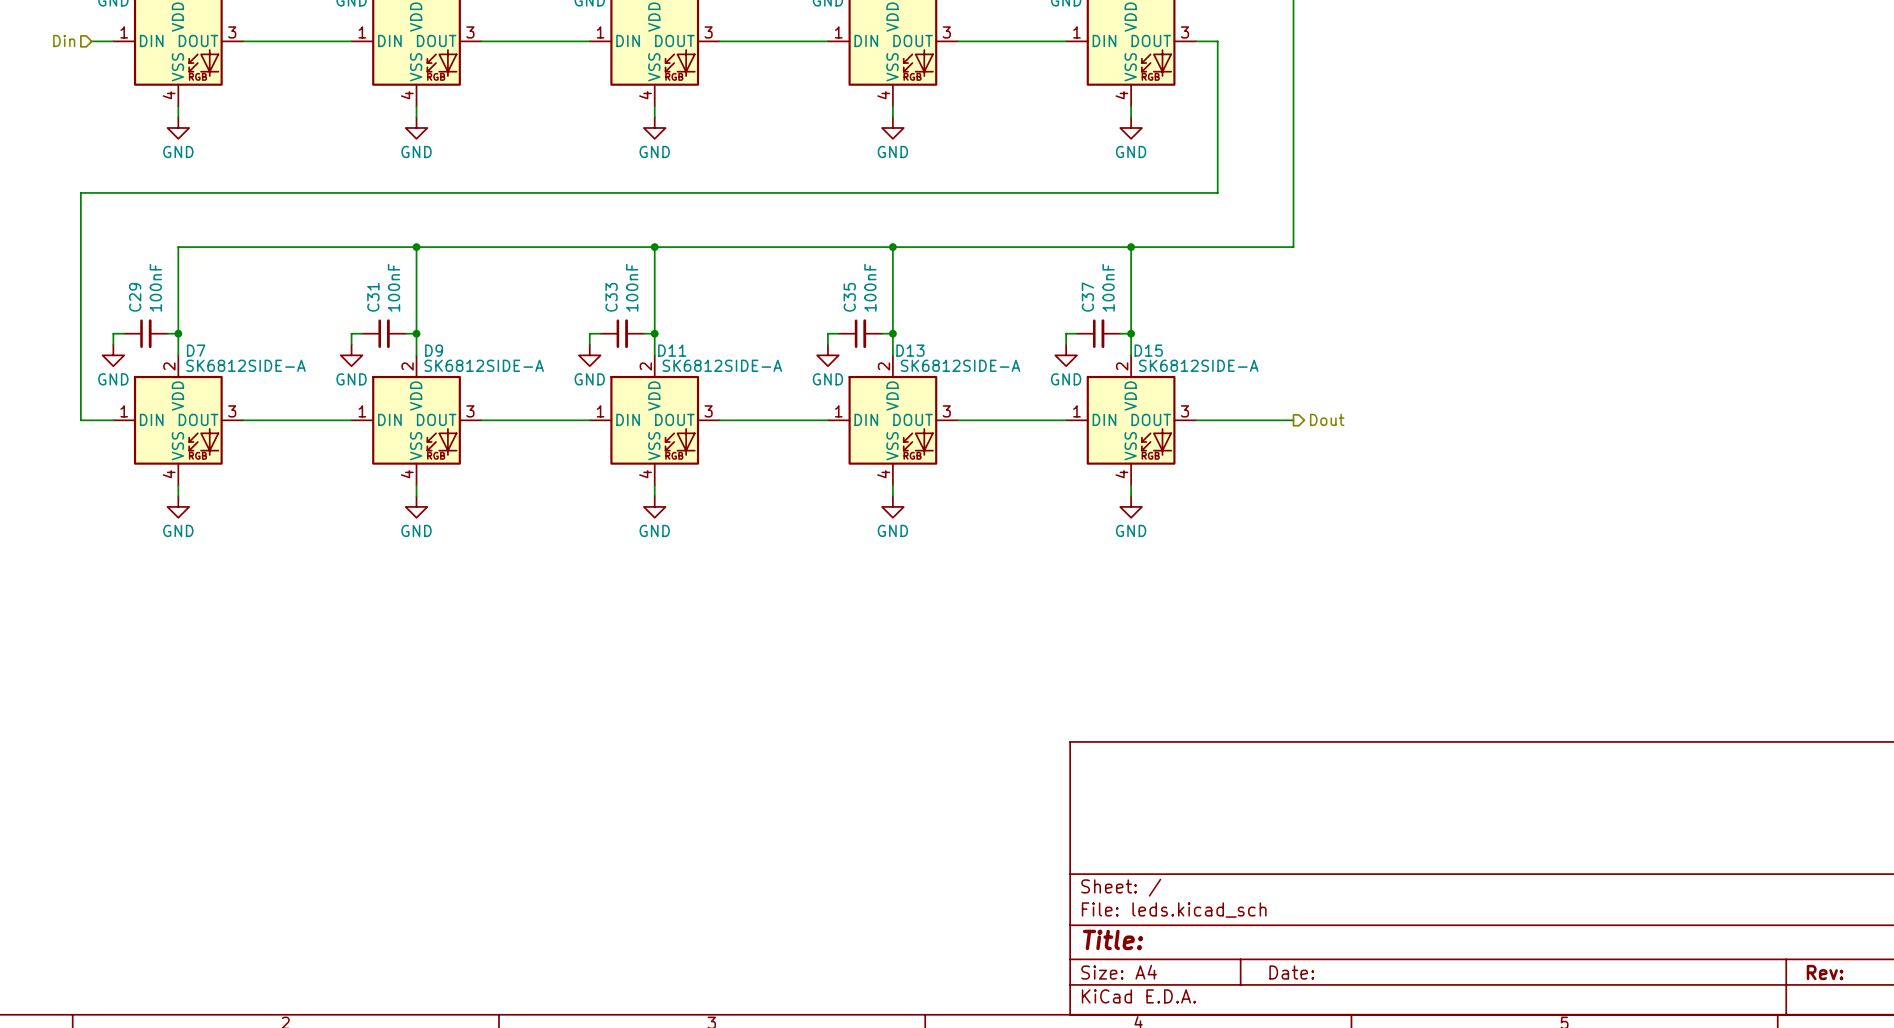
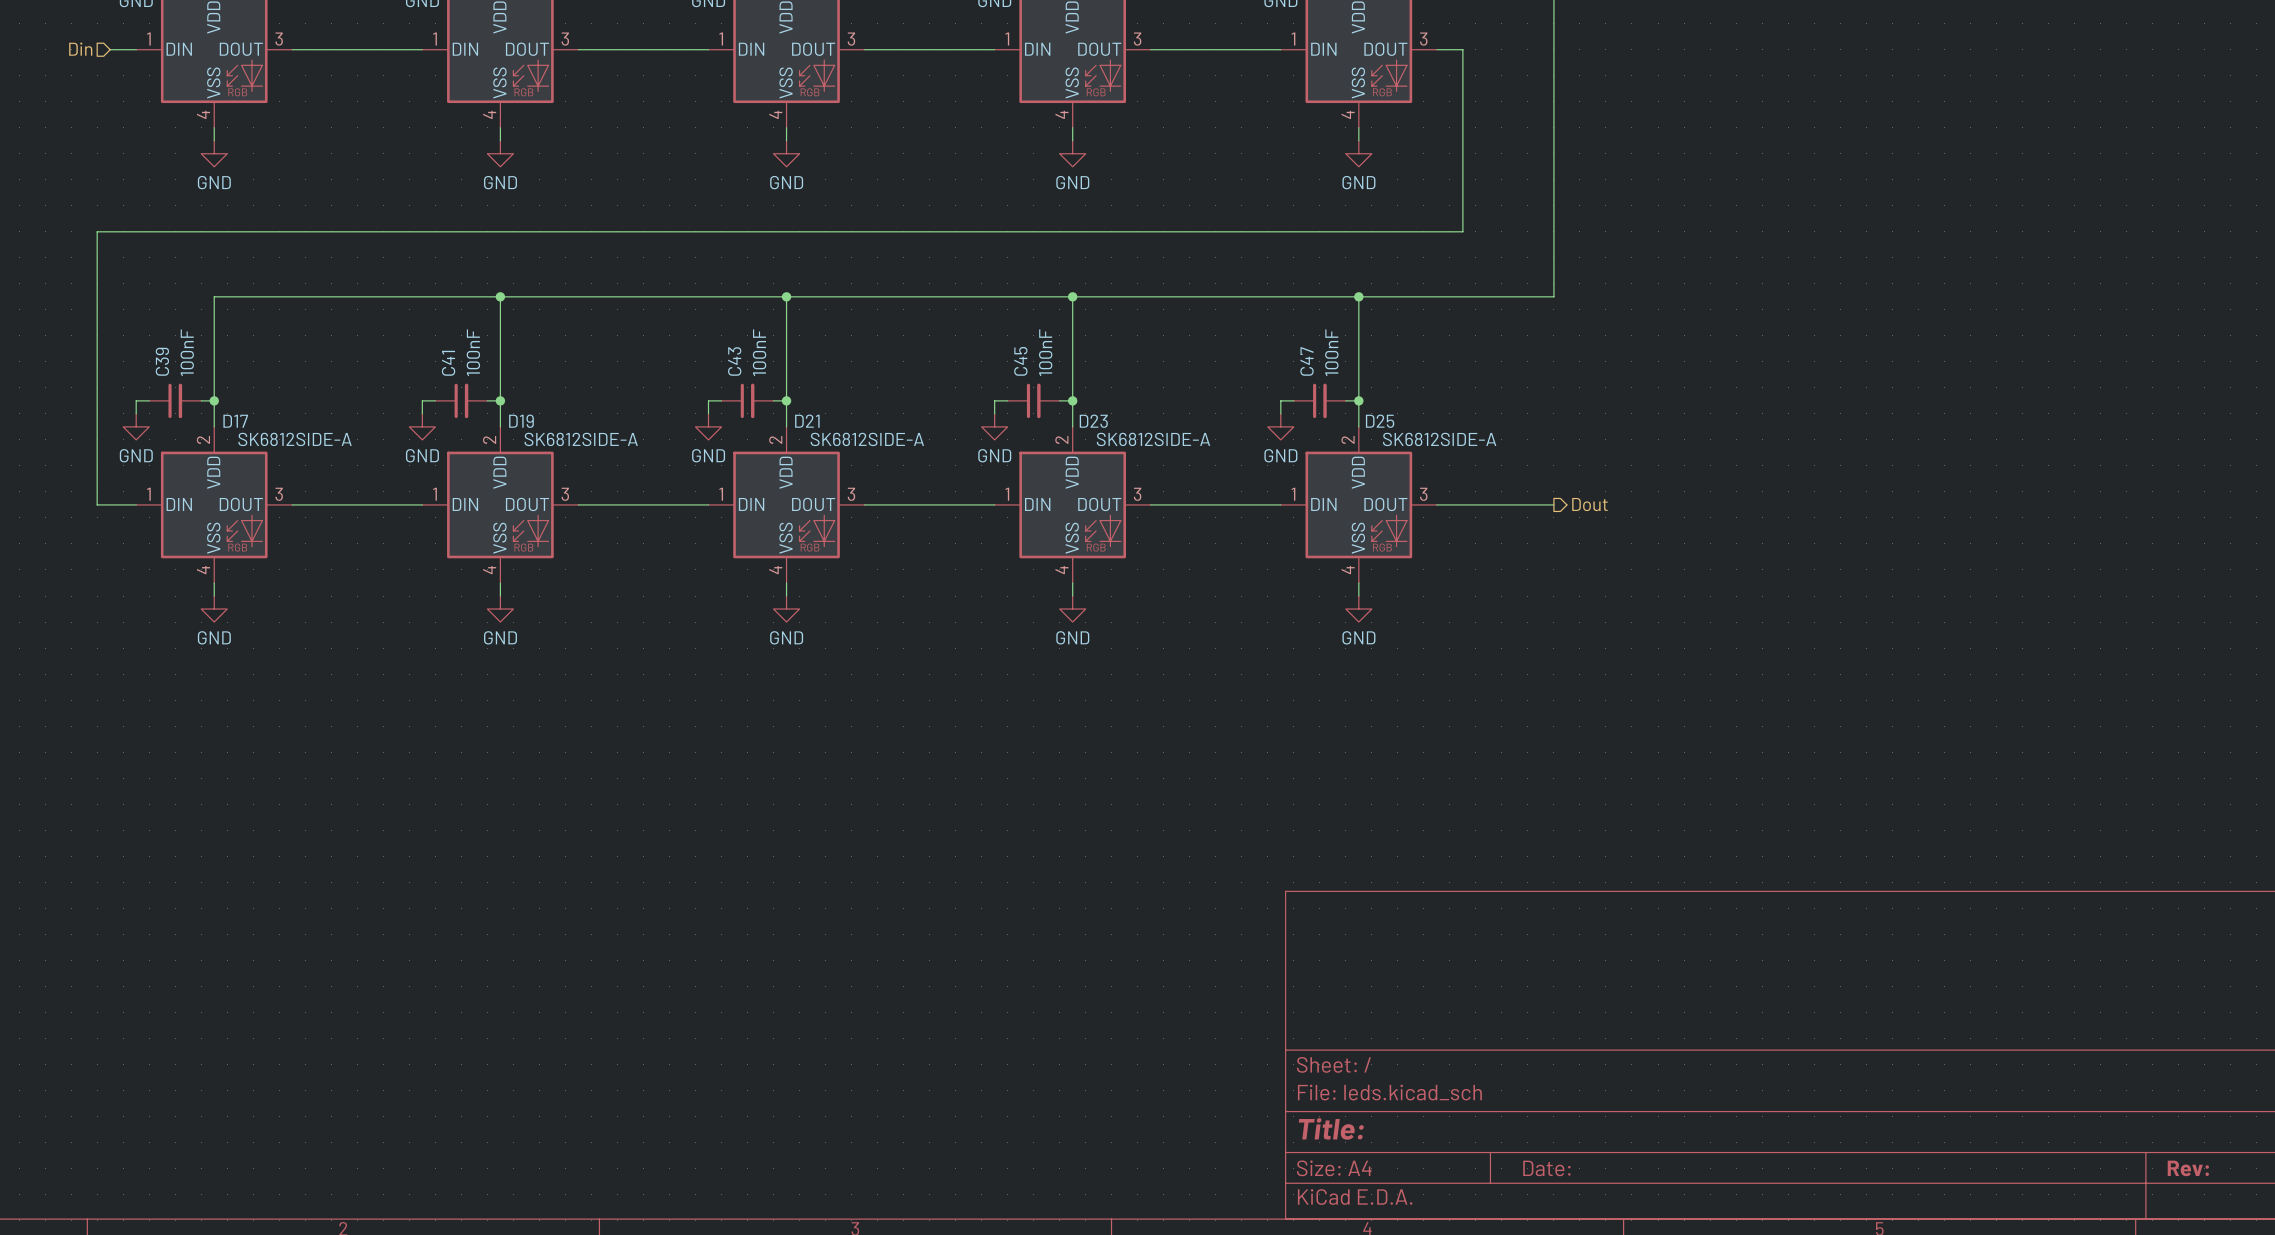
C29 name: C29 (135, 297) -> C39 (162, 361)
C31 name: C31 (373, 297) -> C41 (448, 363)
C33 name: C33 (611, 297) -> C43 (734, 361)
C35 name: C35 (849, 297) -> C45 (1020, 361)
C37 name: C37 (1087, 297) -> C47 (1306, 361)
D7 name: D7 (196, 350) -> D17 (235, 421)
D9 name: D9 (434, 350) -> D19 (521, 421)
D11 name: D11 (672, 350) -> D21 (807, 421)
D13 name: D13 (910, 350) -> D23 (1093, 421)
D15 name: D15 (1148, 350) -> D25 (1380, 421)

